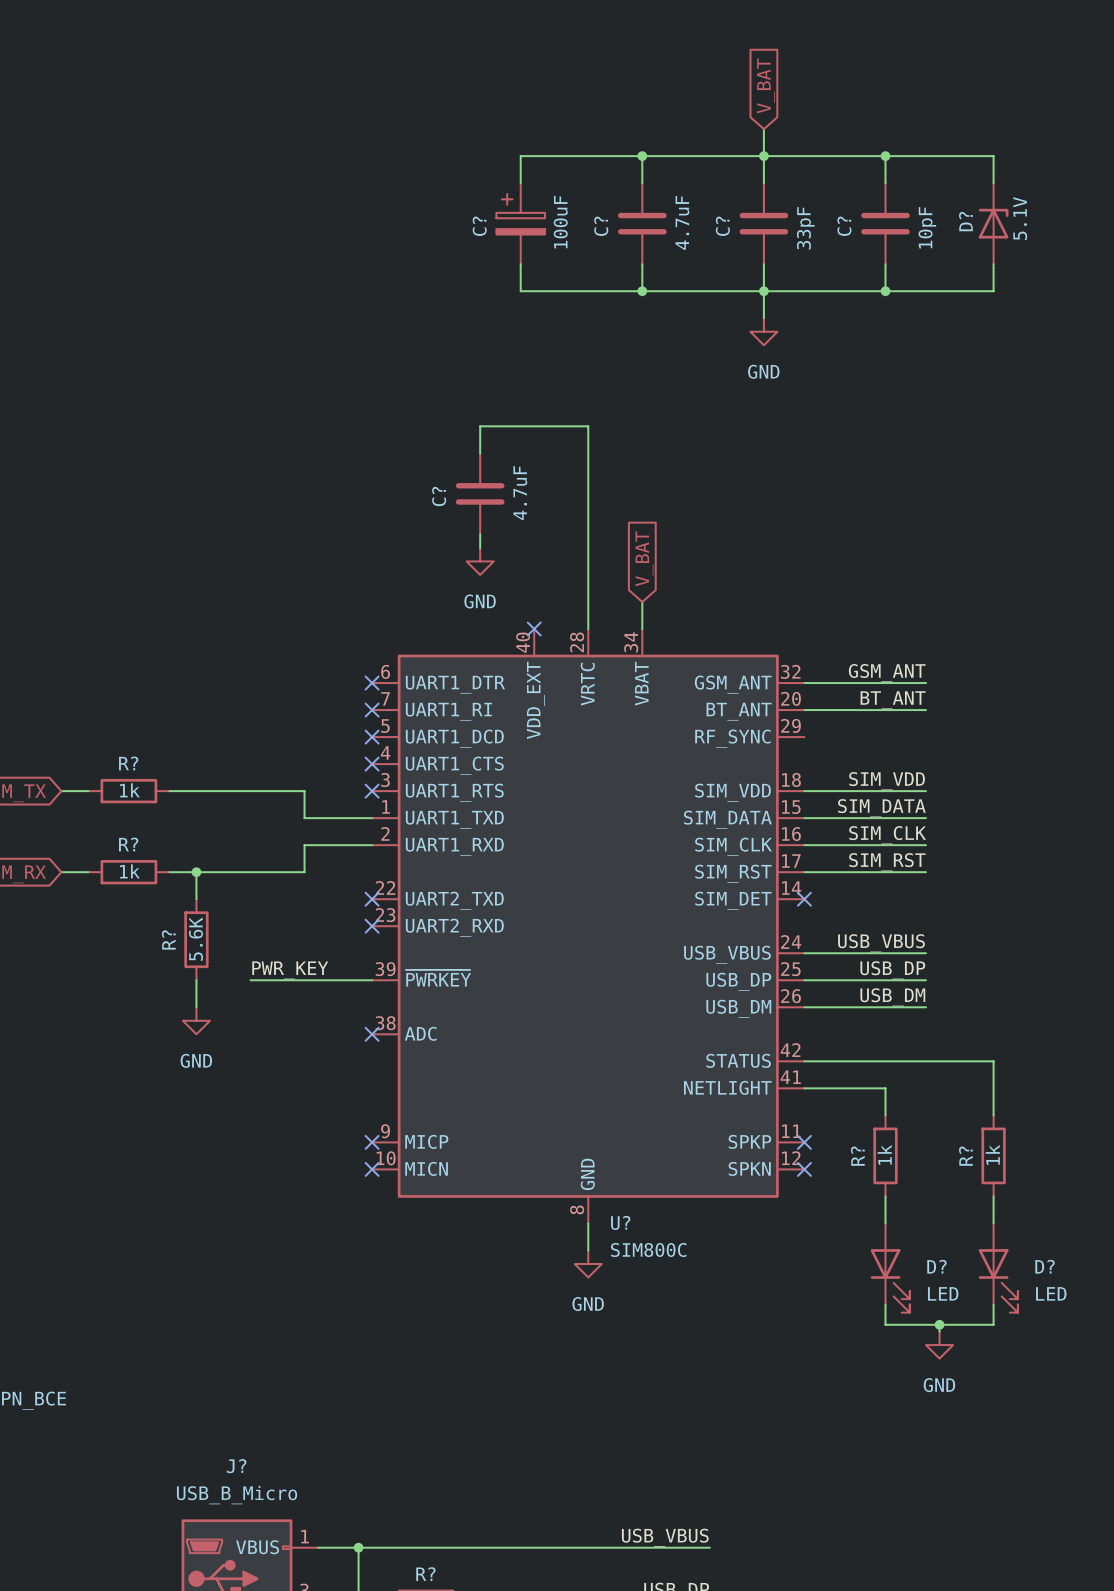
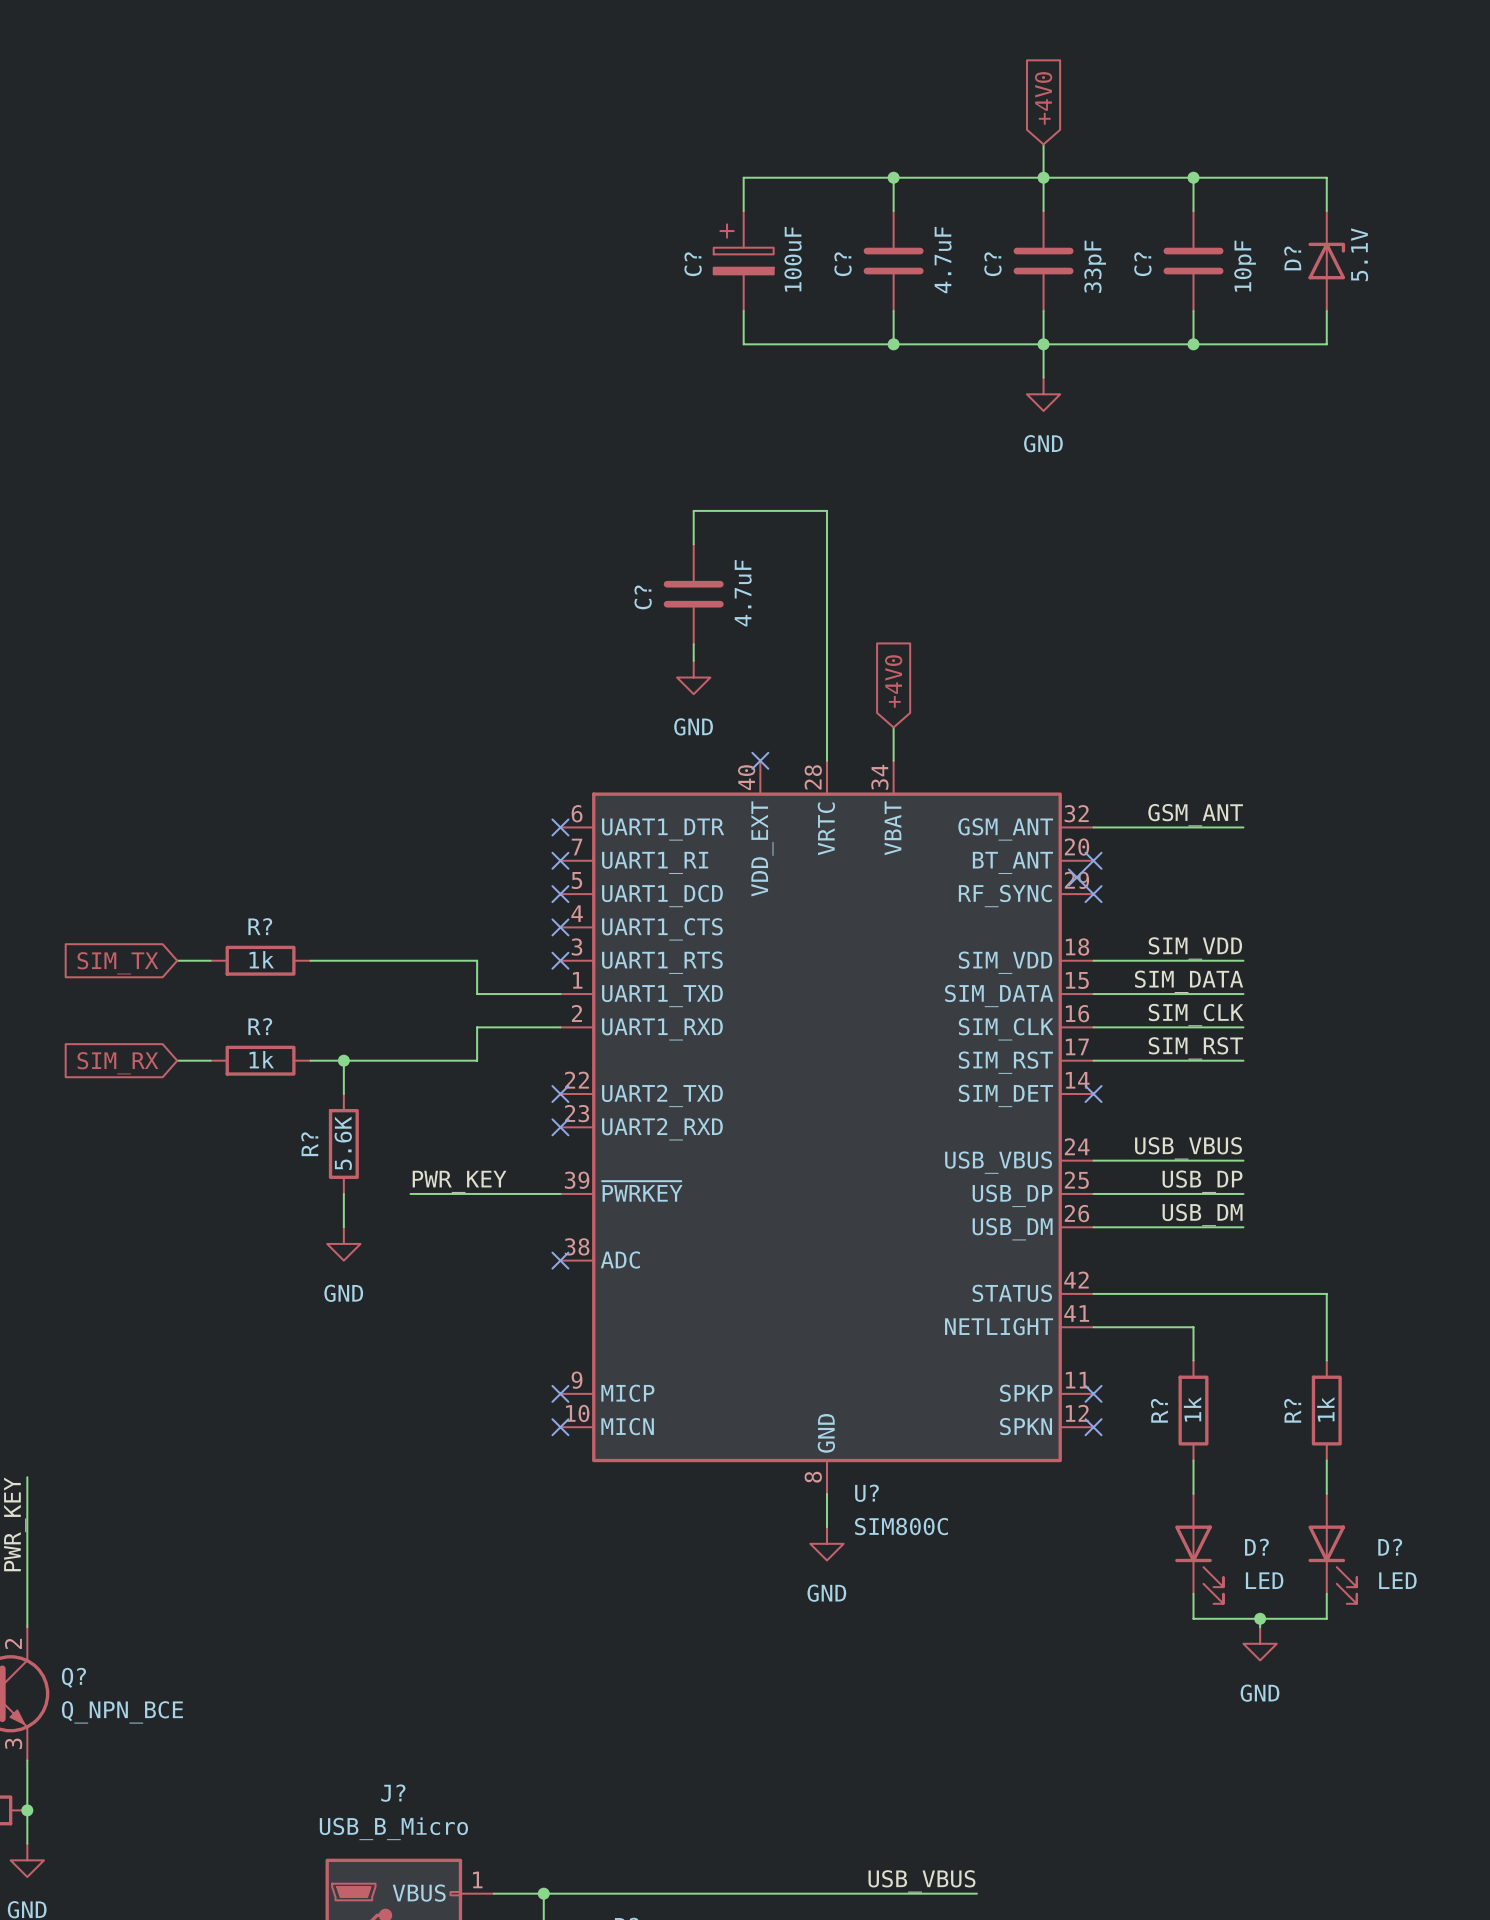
global label: V_BAT (766, 85) -> +4V0 (1043, 98)
global label: V_BAT (644, 558) -> +4V0 (893, 681)
label: BT_ANT (893, 700) -> none
wire: (804, 710) (926, 710) -> none
no-connect mark: none -> (1093, 860)
no-connect mark: none -> (1076, 877)
no-connect mark: none -> (1093, 894)

